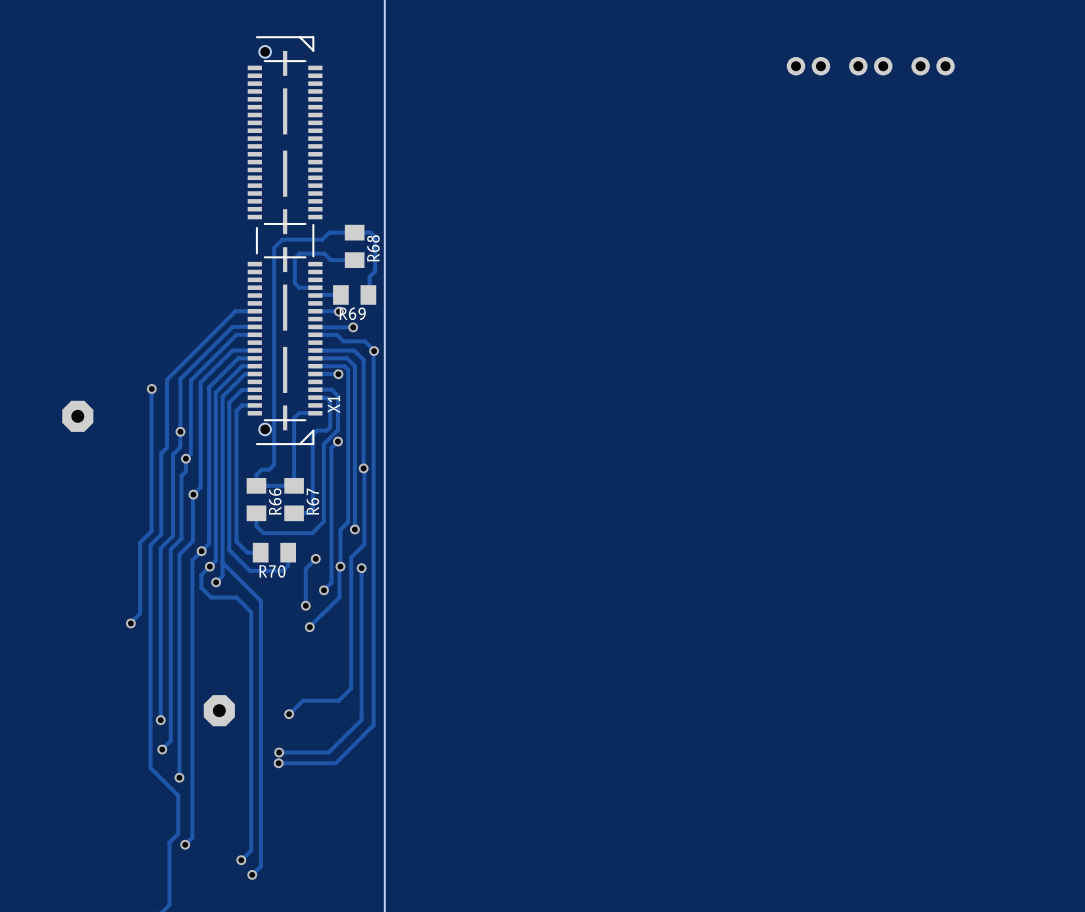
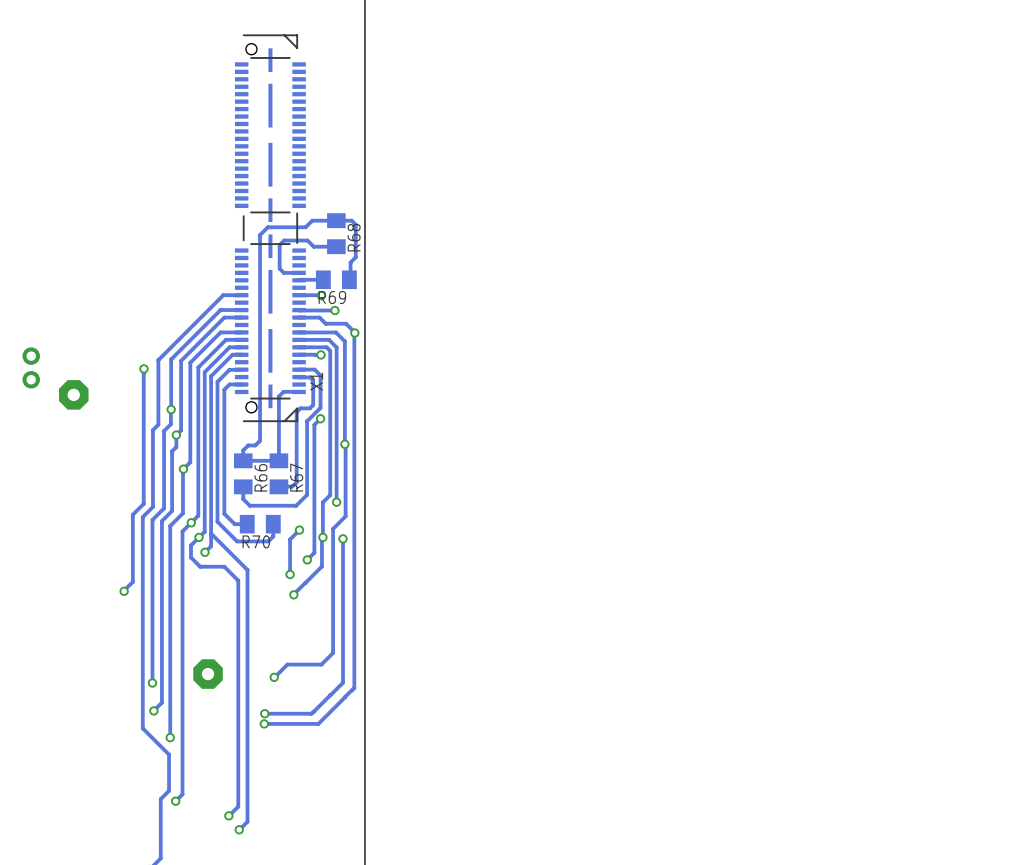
part: (808, 66) -> none
part: (870, 66) -> none
part: (933, 66) -> none
part: none -> (31, 367)

